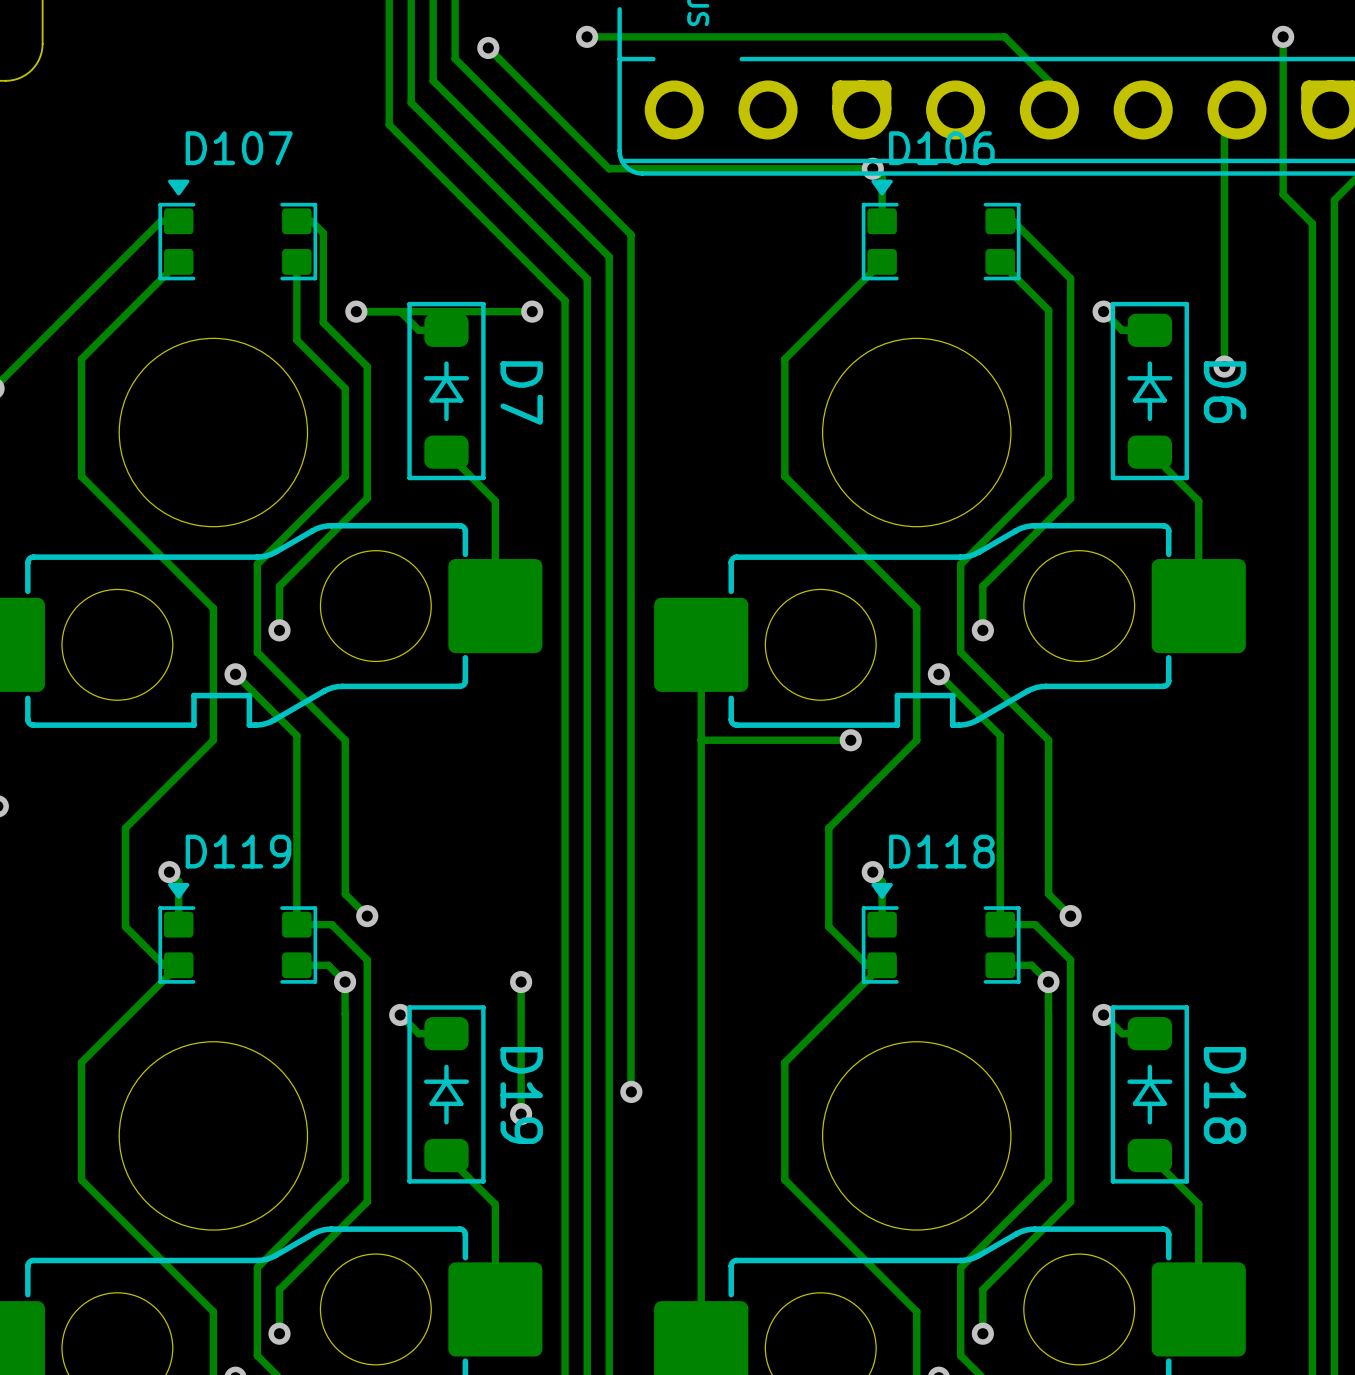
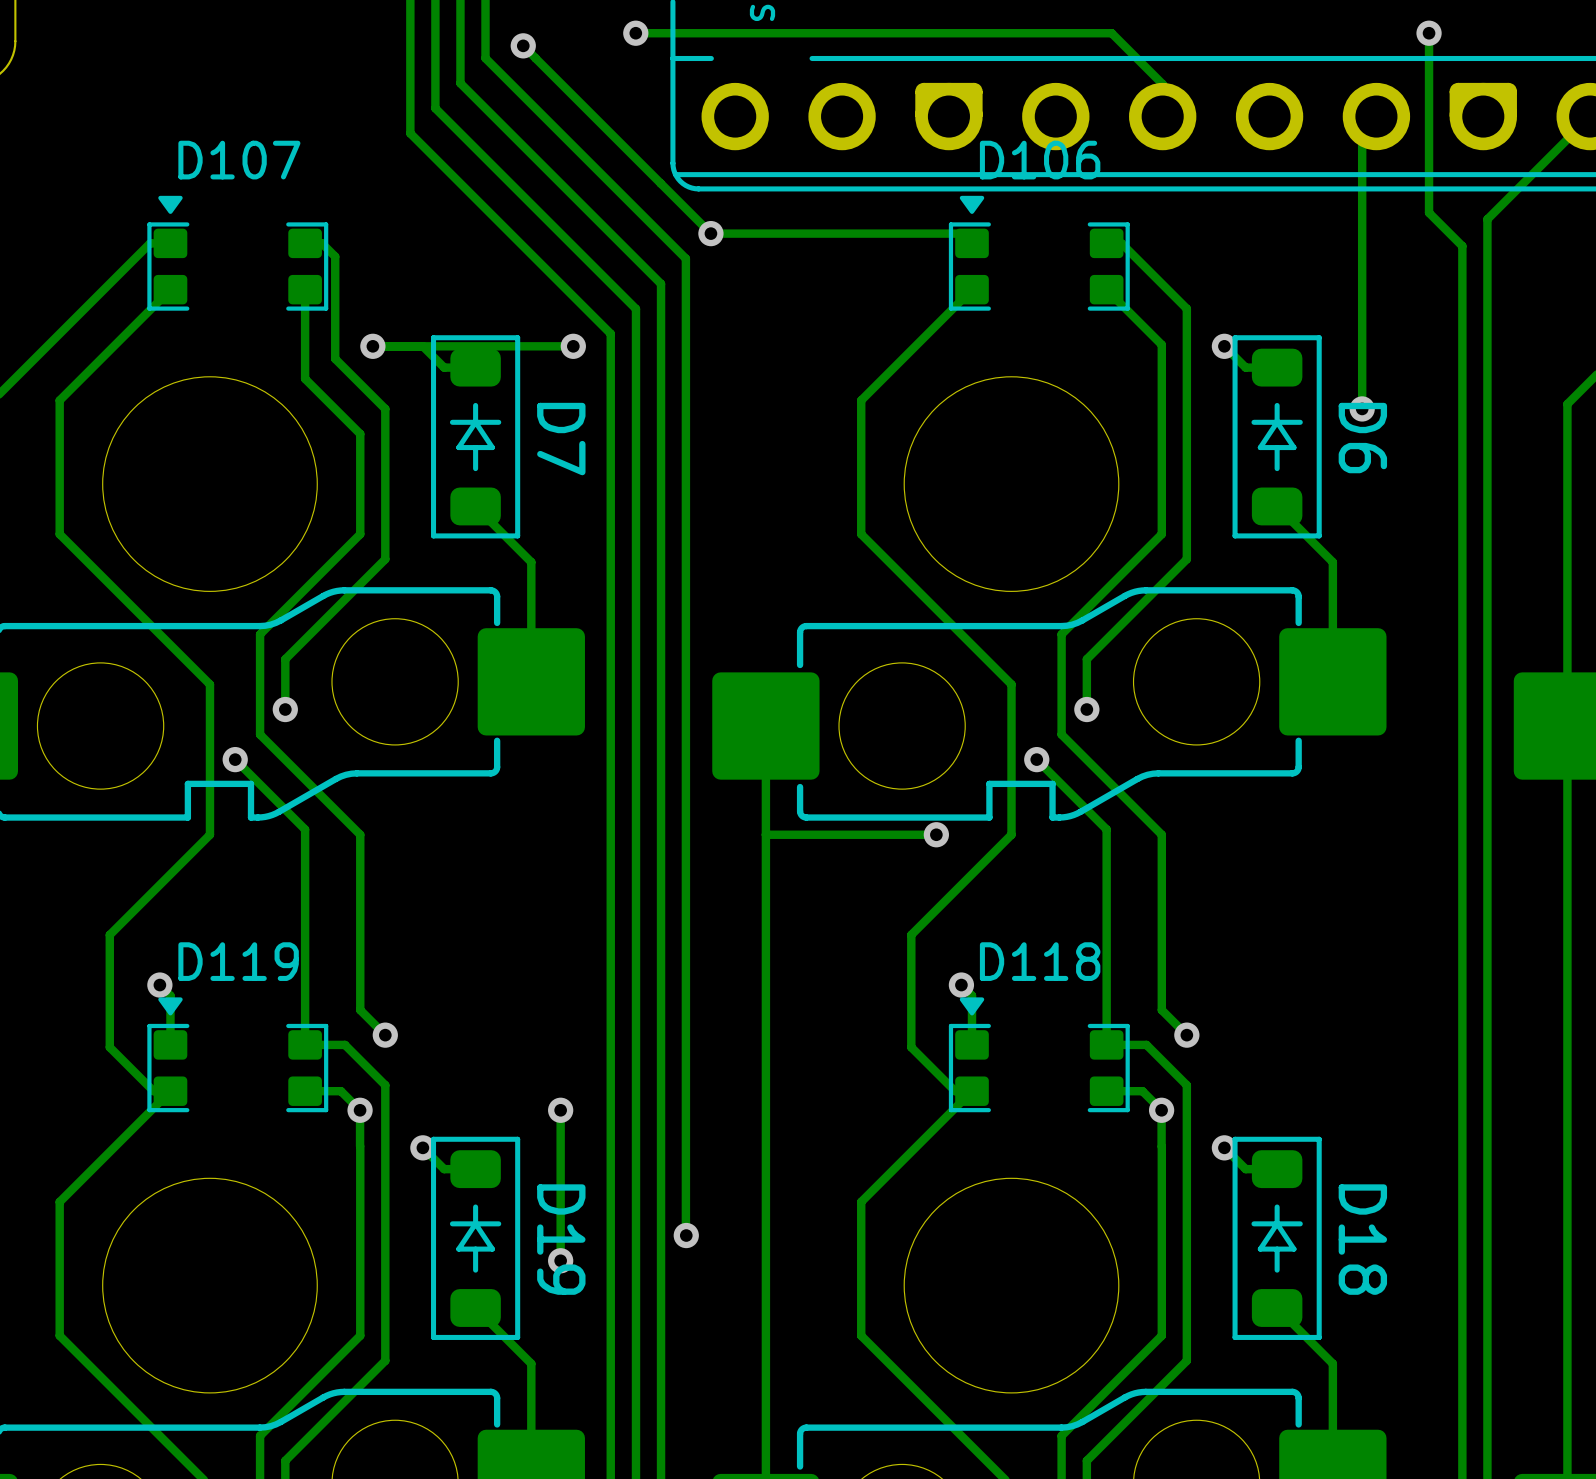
track: (609, 168) (872, 168) (882, 178) (882, 221) -> (660, 183) (710, 233) (962, 233) (972, 243)
via: (872, 168) -> none
via: none -> (710, 233)

